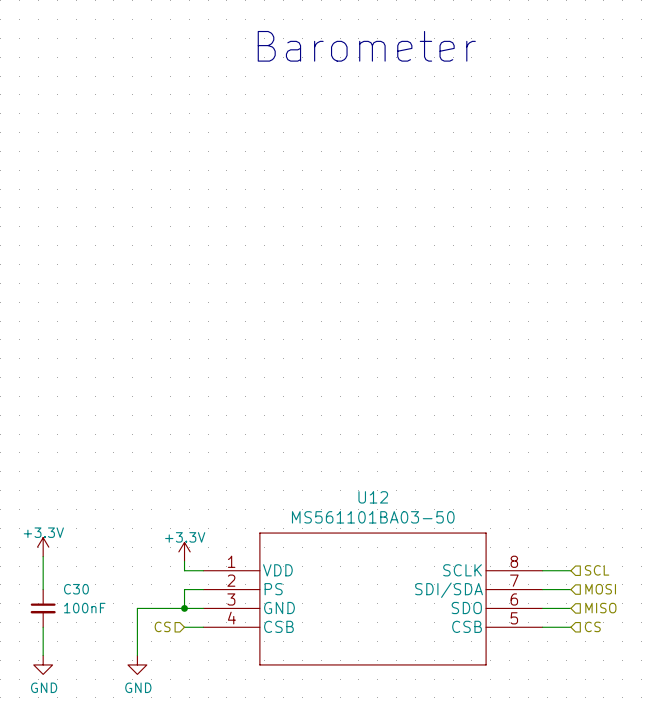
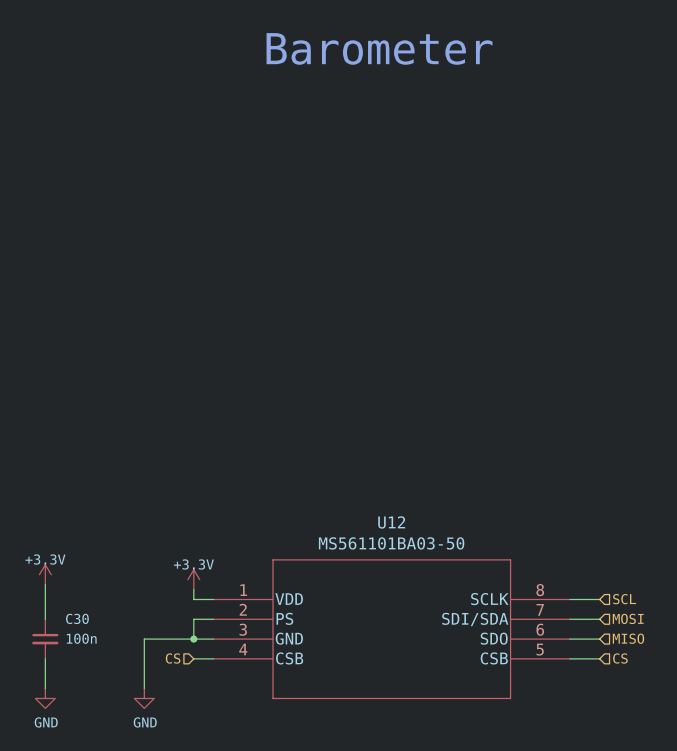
C30 value: 100nF (84, 608) -> 100n (81, 638)

